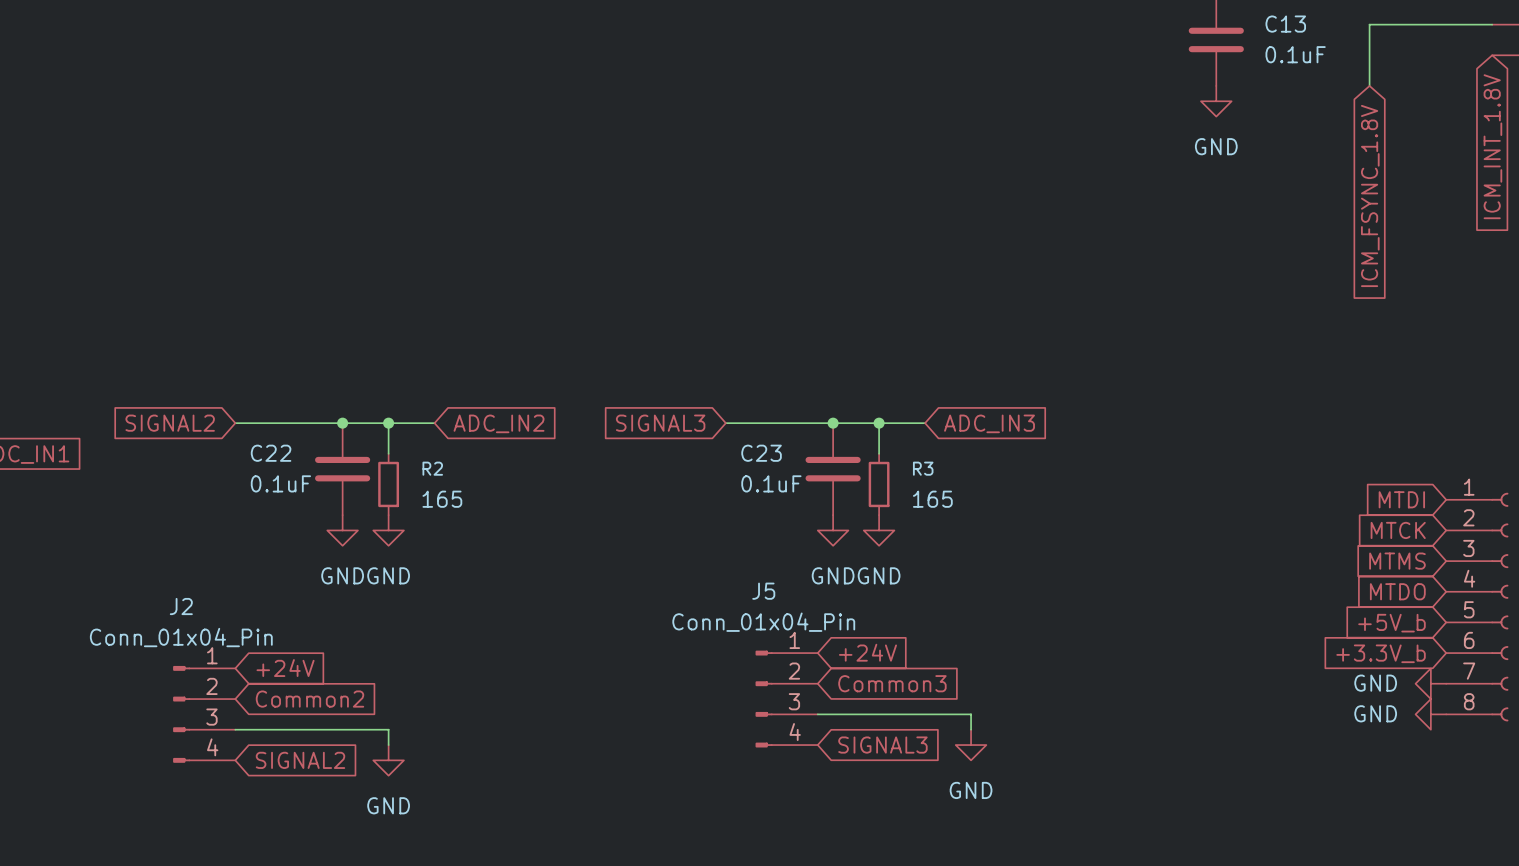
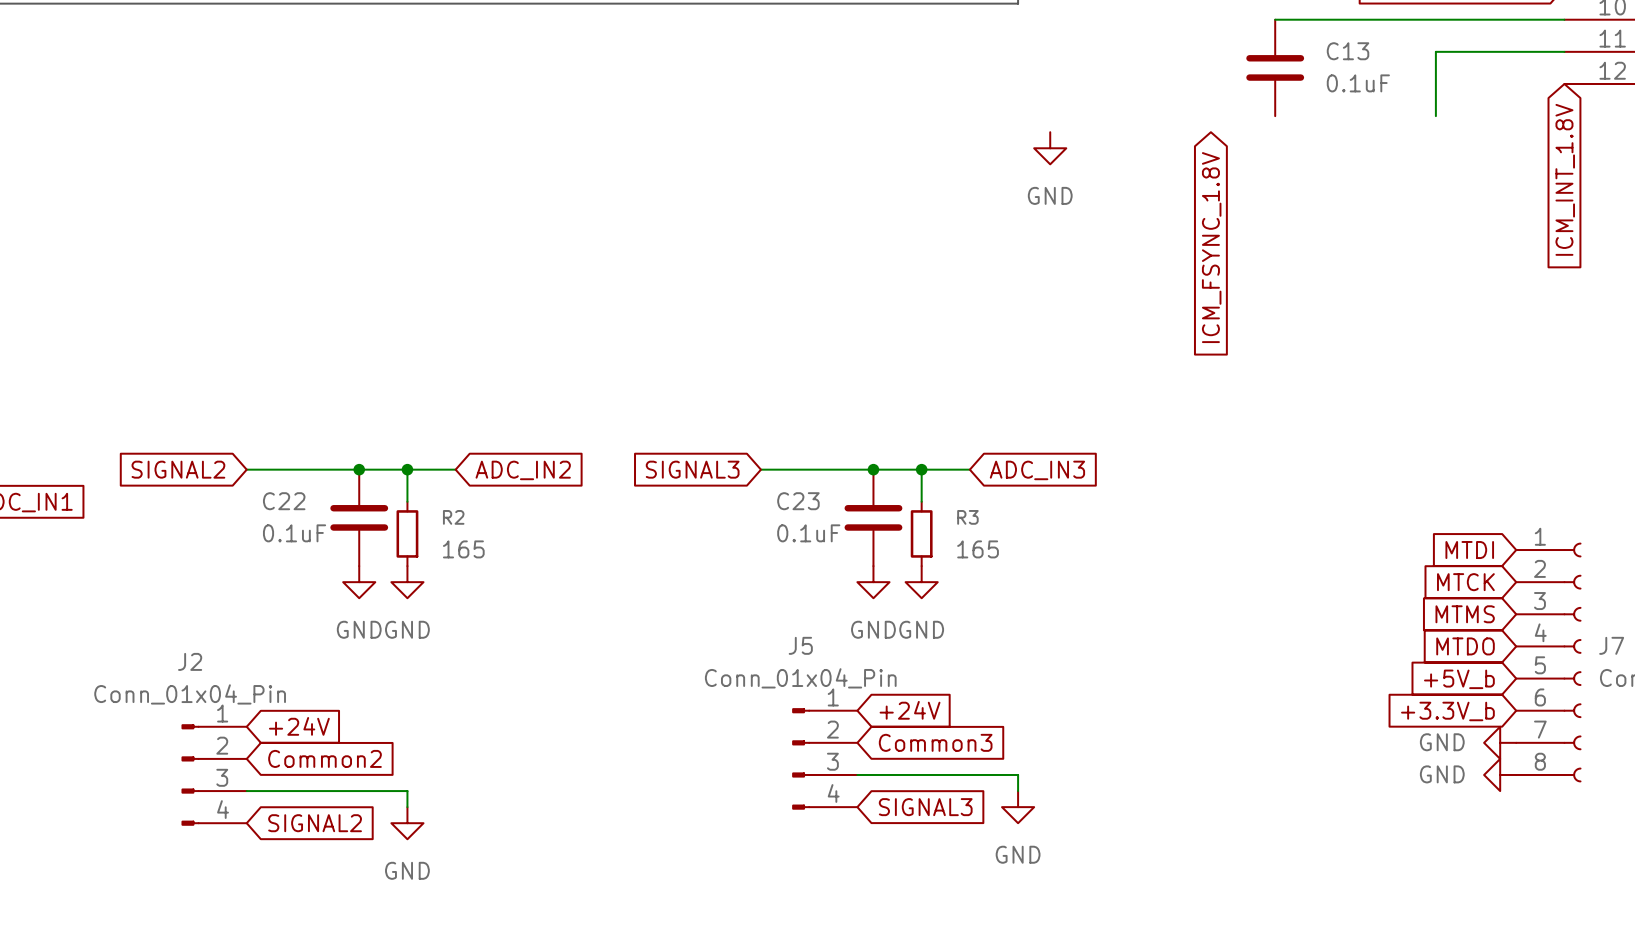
power symbol: GND (1216, 101) -> none
power symbol: none -> GND (1050, 148)
global label position: ICM_FSYNC_1.8V (1370, 196) -> ICM_FSYNC_1.8V (1211, 247)

